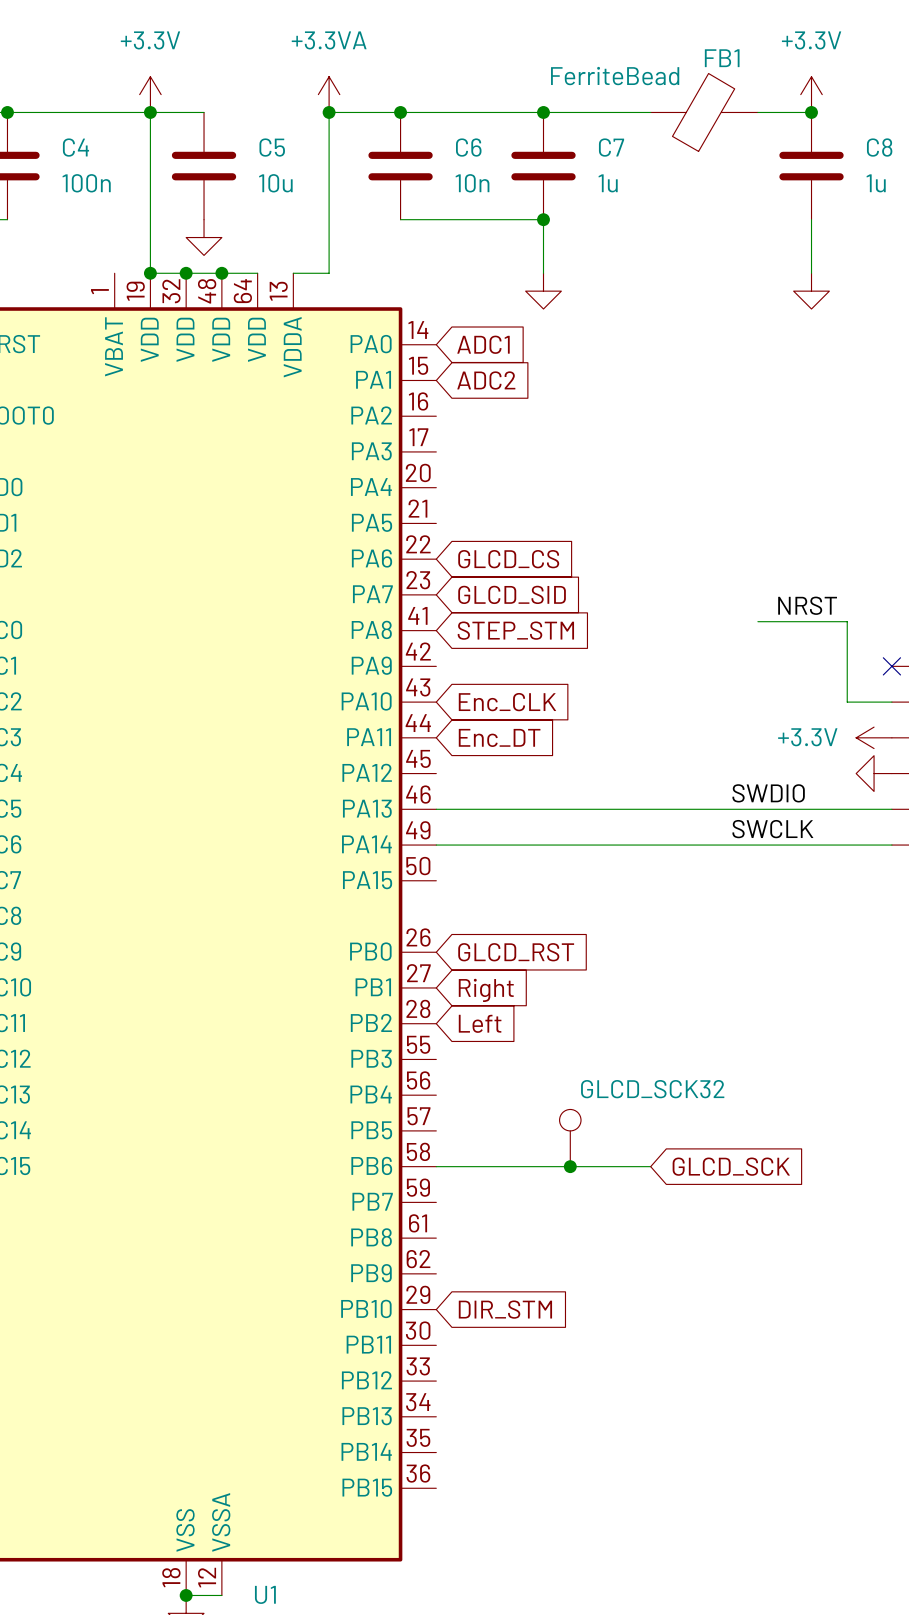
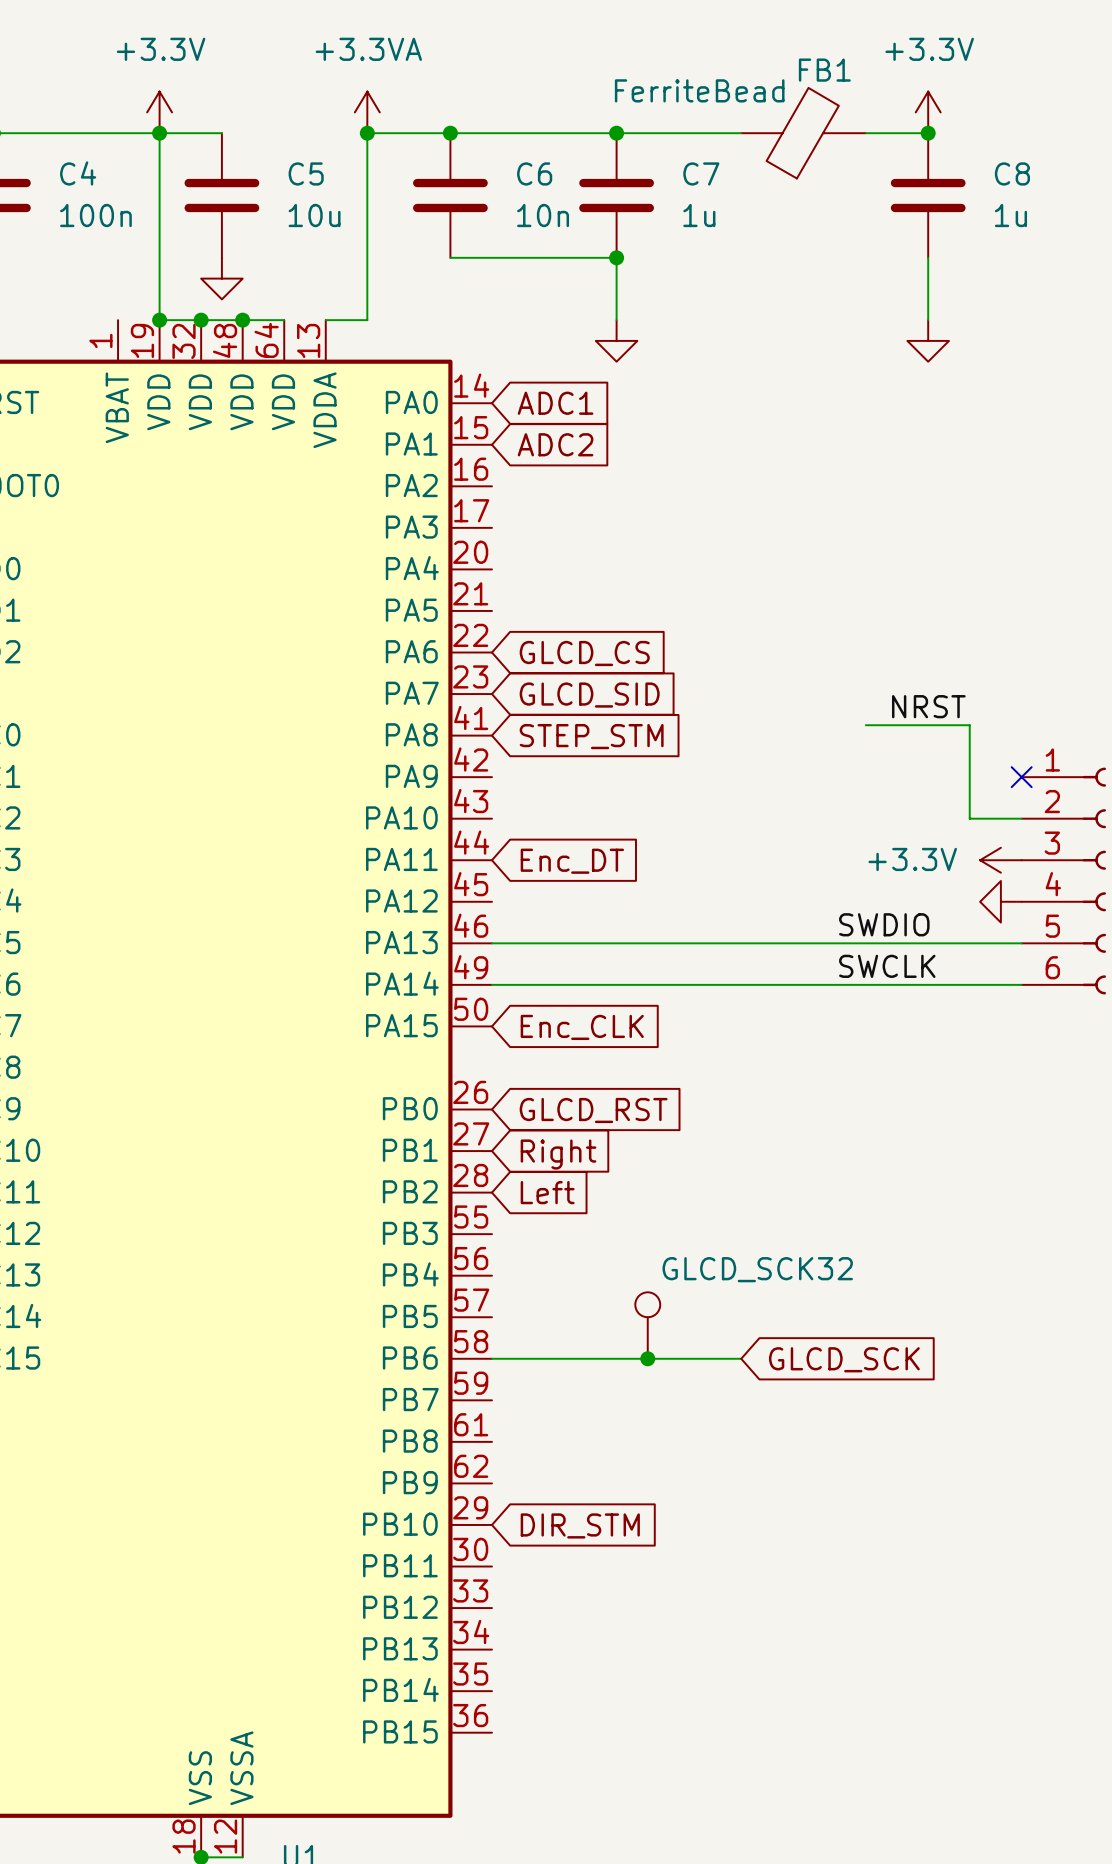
global label position: Enc_CLK (507, 702) -> Enc_CLK (582, 1027)

